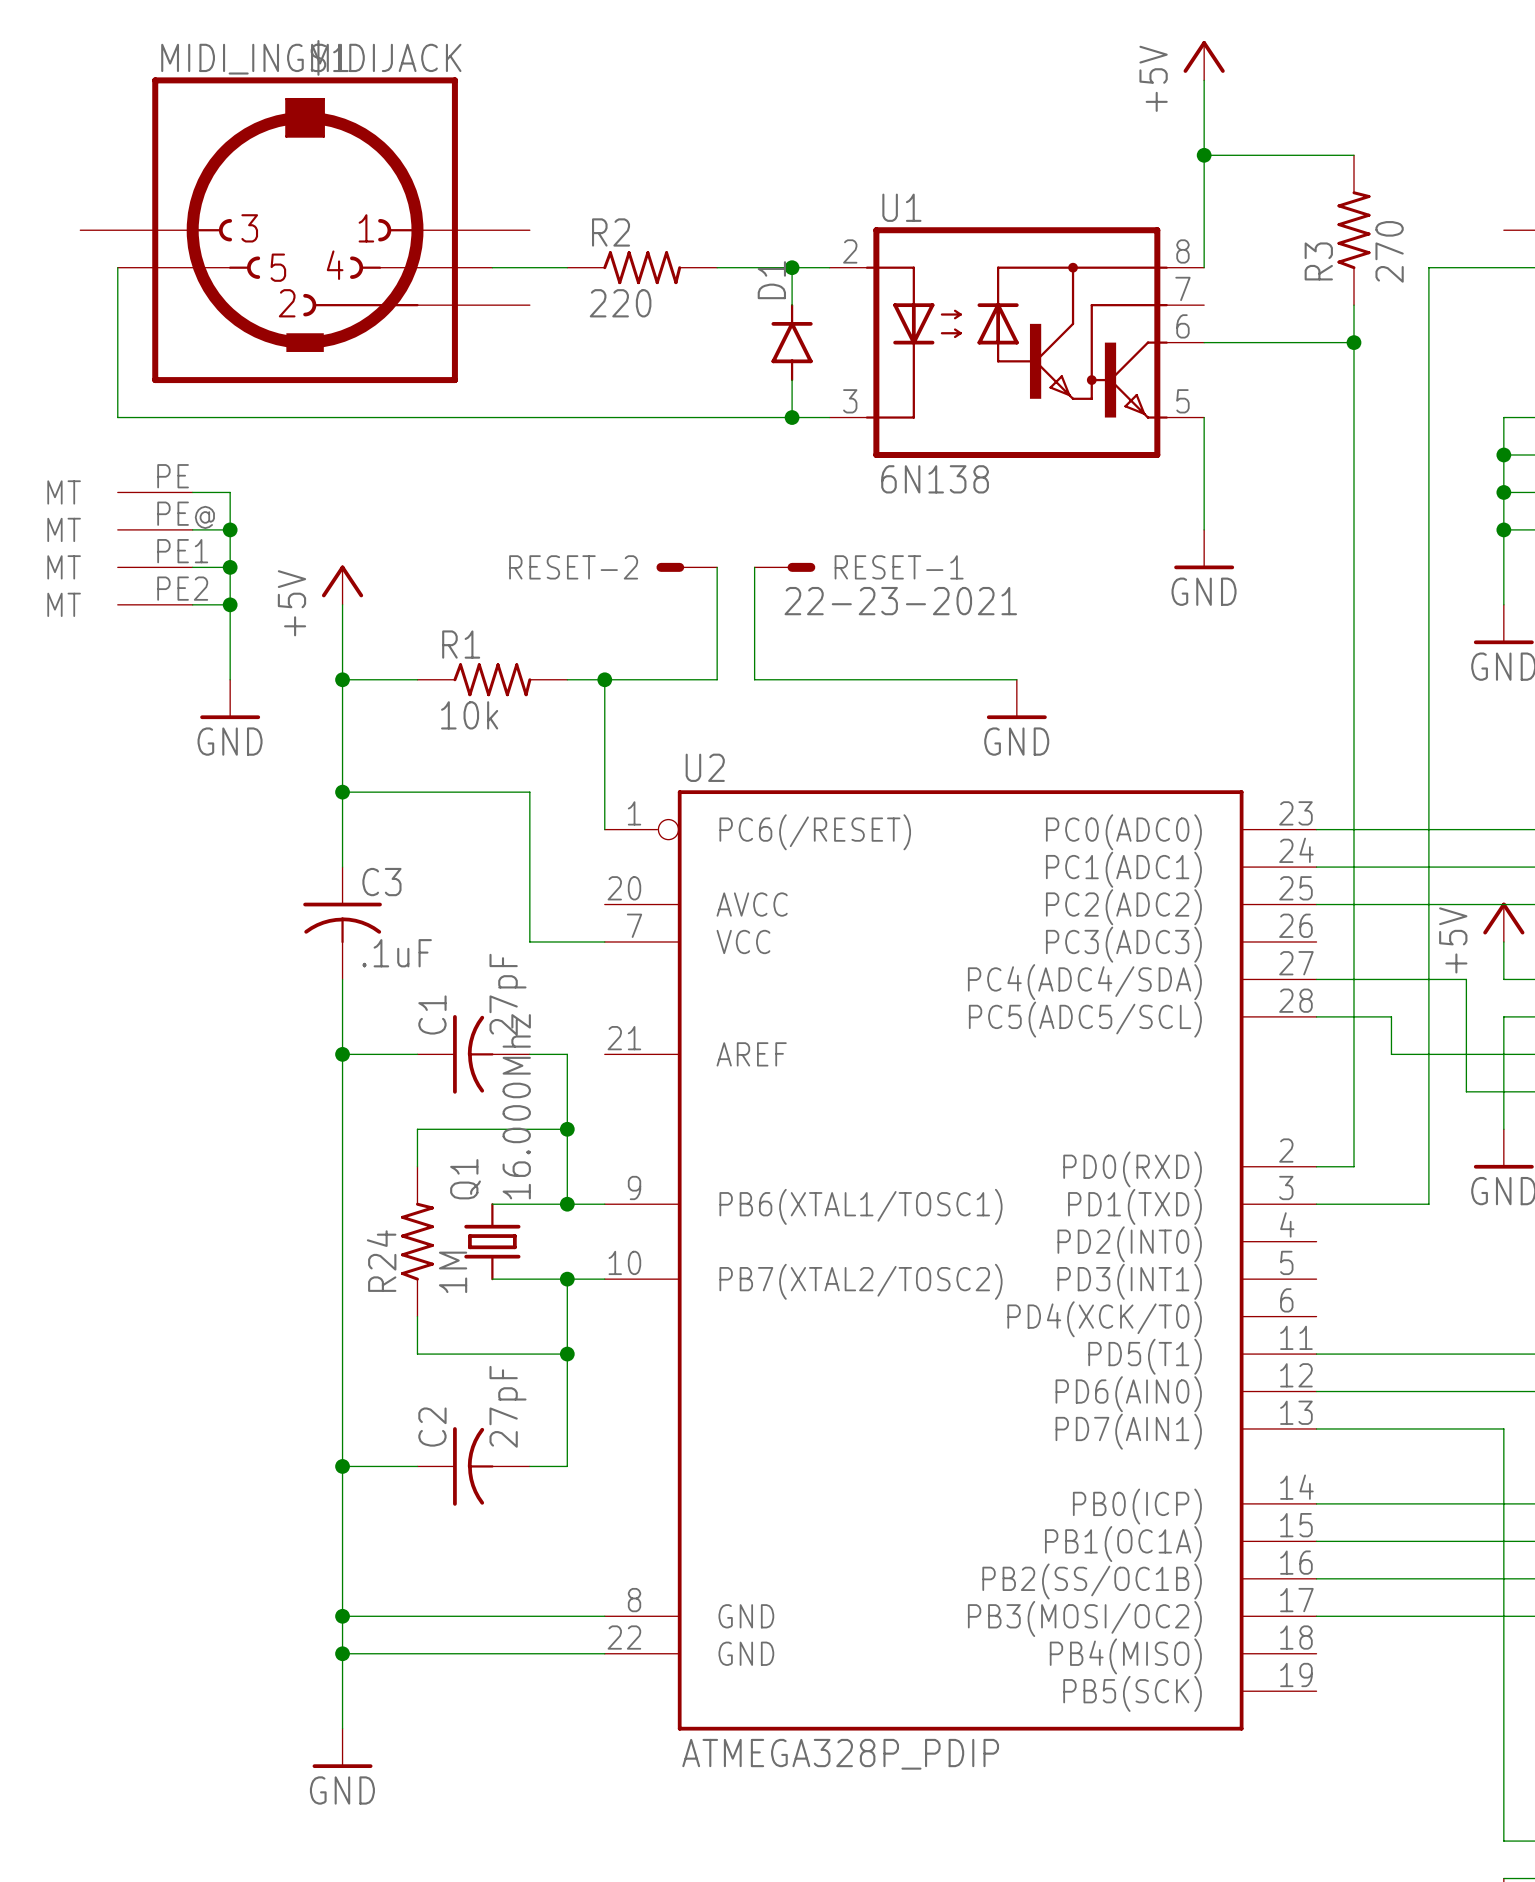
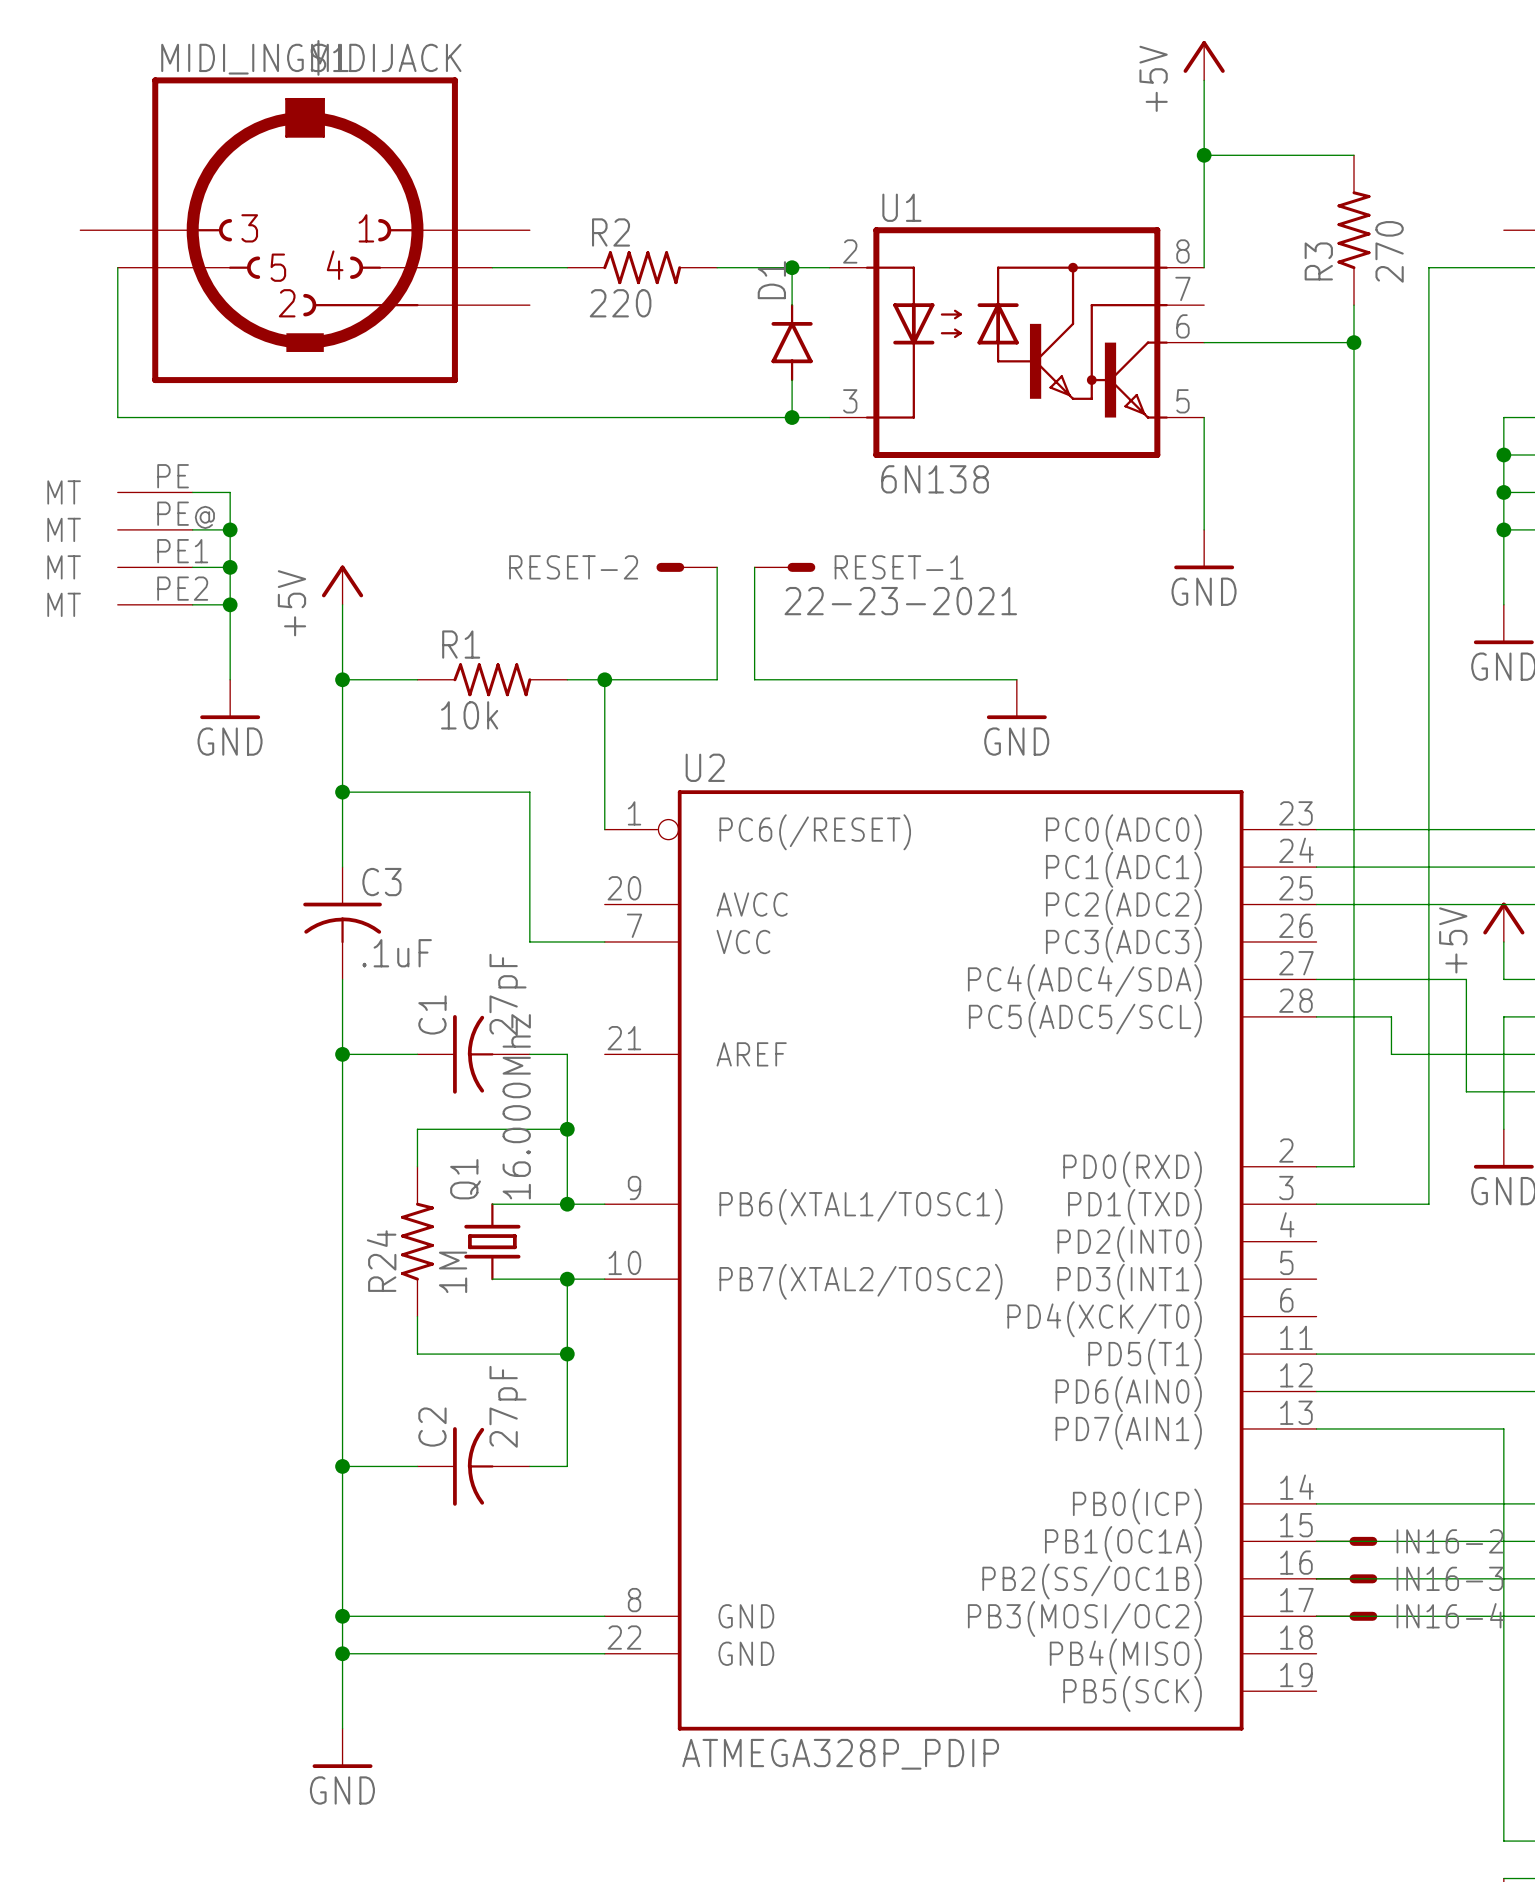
IN16-2: none -> (1346, 1541)
IN16-3: none -> (1346, 1578)
IN16-4: none -> (1346, 1616)

